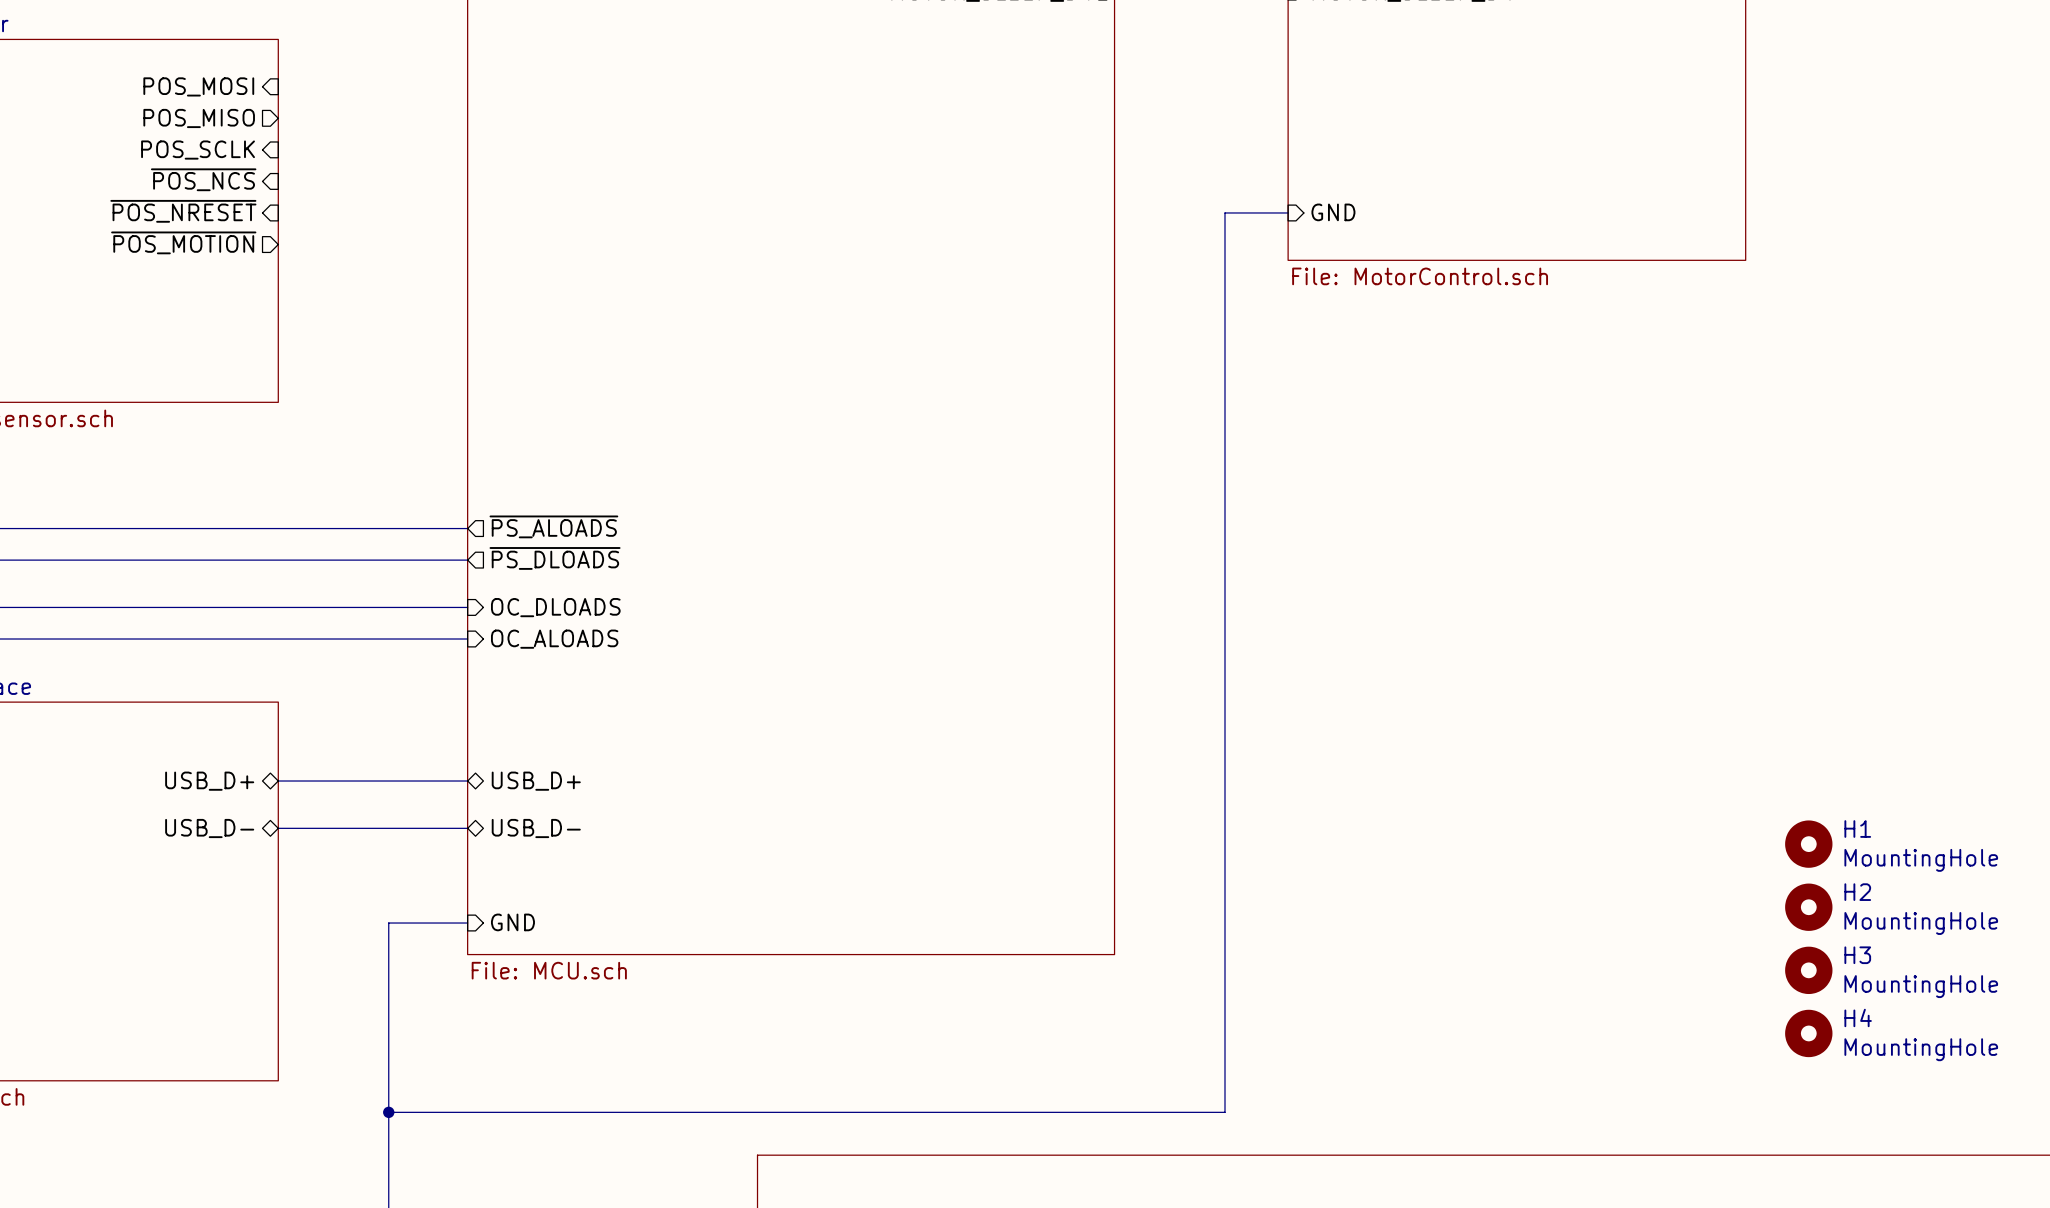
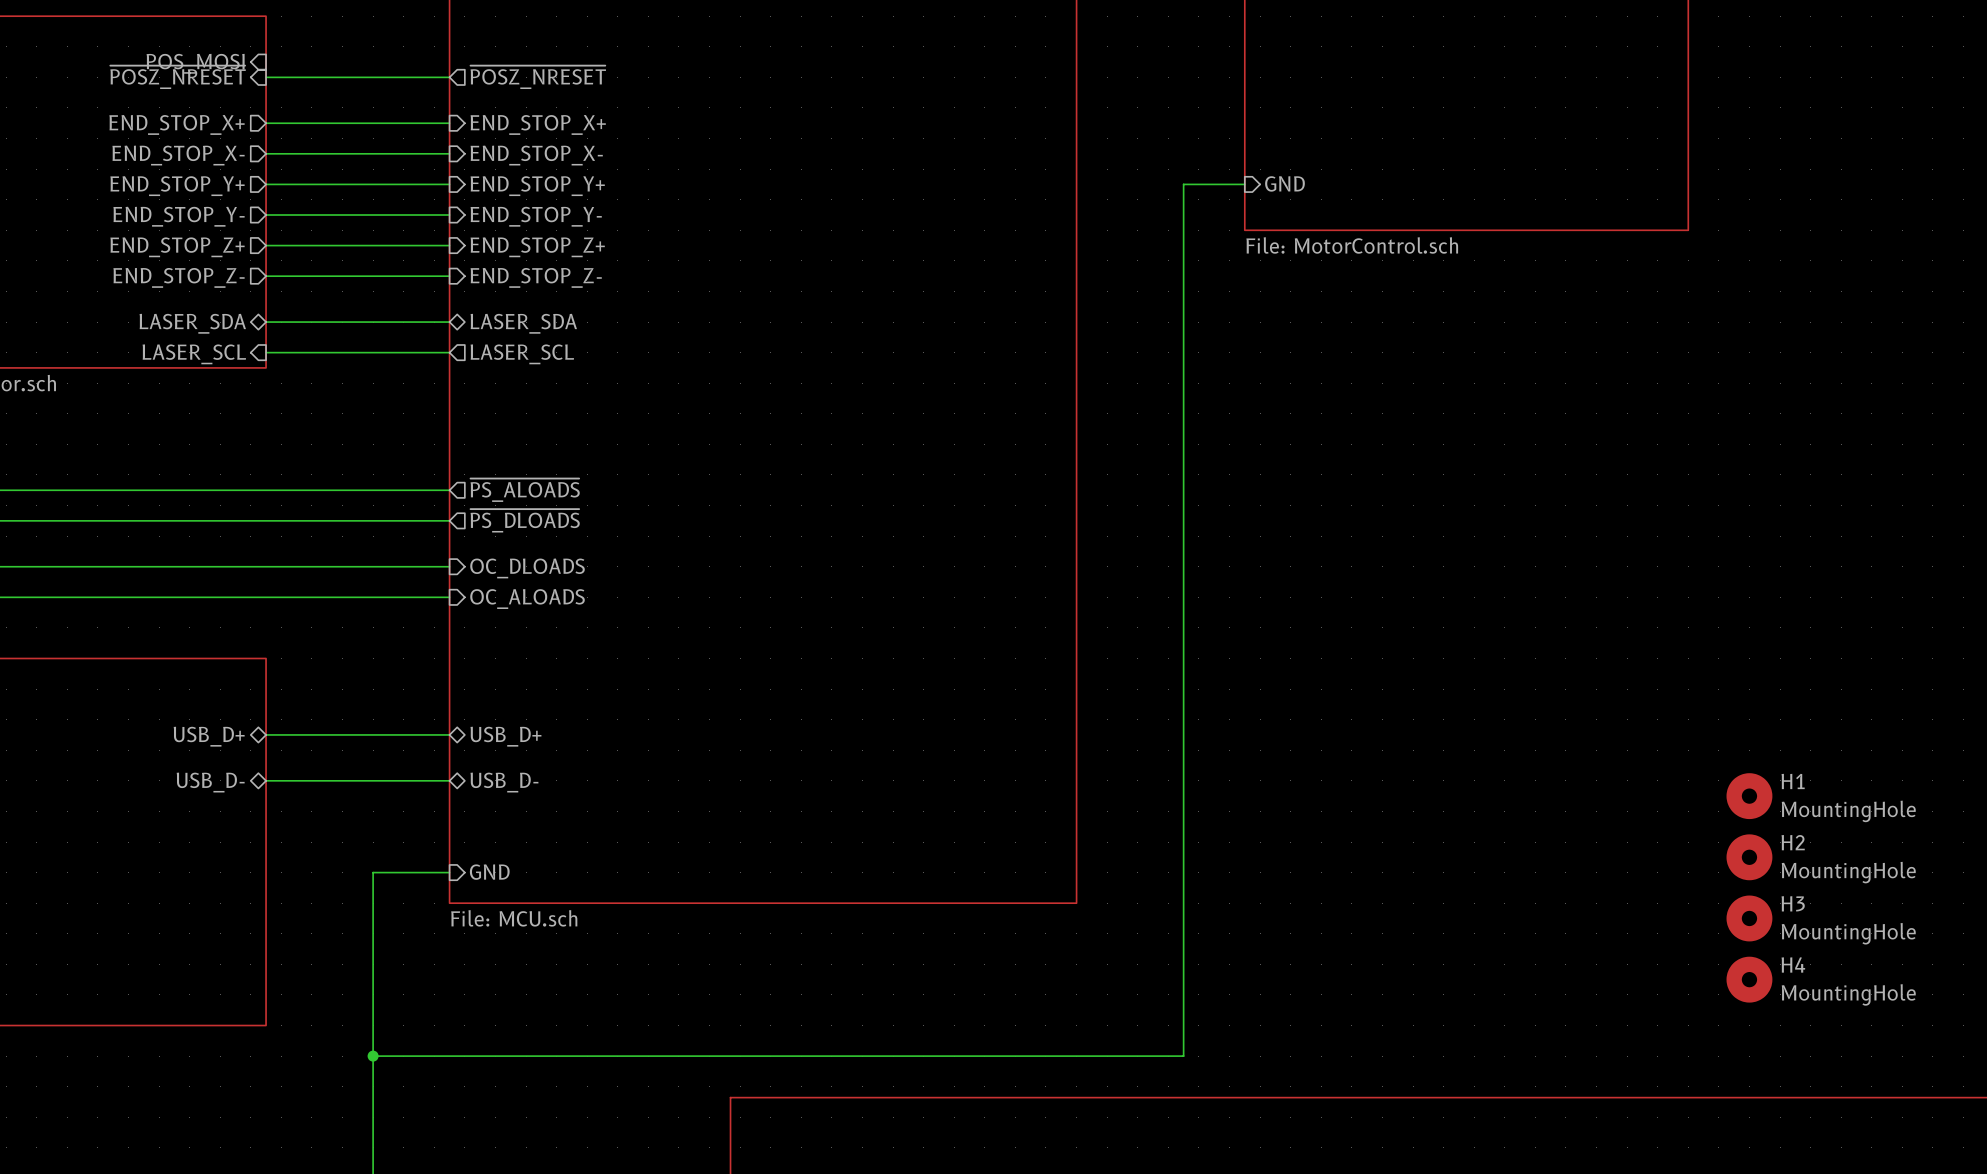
sheet pin: none -> ~{POSZ_NRESET} (178, 77)
sheet pin: none -> ~{POSZ_NRESET} (538, 77)
wire: none -> (266, 77) (449, 77)
sheet pin: POS_MISO (199, 118) -> none
wire: none -> (266, 123) (449, 123)
sheet pin shape: input (198, 150) -> output (177, 124)
sheet pin: POS_SCLK (198, 150) -> END_STOP_X+ (177, 124)
sheet pin: none -> END_STOP_X+ (538, 124)
sheet pin shape: input (203, 179) -> output (178, 155)
sheet pin: ~{POS_NCS} (203, 179) -> END_STOP_X- (178, 155)
wire: none -> (266, 153) (449, 153)
sheet pin: none -> END_STOP_X- (536, 155)
sheet pin shape: input (183, 211) -> output (177, 186)
sheet pin: ~{POS_NRESET} (183, 211) -> END_STOP_Y+ (177, 186)
wire: none -> (266, 184) (449, 184)
sheet pin: none -> END_STOP_Y+ (537, 186)
sheet pin: ~{POS_MOTION} (183, 242) -> END_STOP_Y- (179, 216)
wire: none -> (266, 215) (449, 215)
sheet pin: none -> END_STOP_Y- (536, 216)
sheet pin: none -> END_STOP_Z+ (177, 247)
wire: none -> (266, 245) (449, 245)
sheet pin: none -> END_STOP_Z+ (537, 247)
sheet pin: none -> END_STOP_Z- (179, 277)
wire: none -> (266, 276) (449, 276)
sheet pin: none -> END_STOP_Z- (536, 277)
wire: none -> (266, 322) (449, 322)
sheet pin: none -> LASER_SDA (192, 323)
sheet pin: none -> LASER_SDA (523, 323)
sheet pin: none -> LASER_SCL (194, 354)
wire: none -> (266, 352) (449, 352)
sheet pin: none -> LASER_SCL (522, 354)

